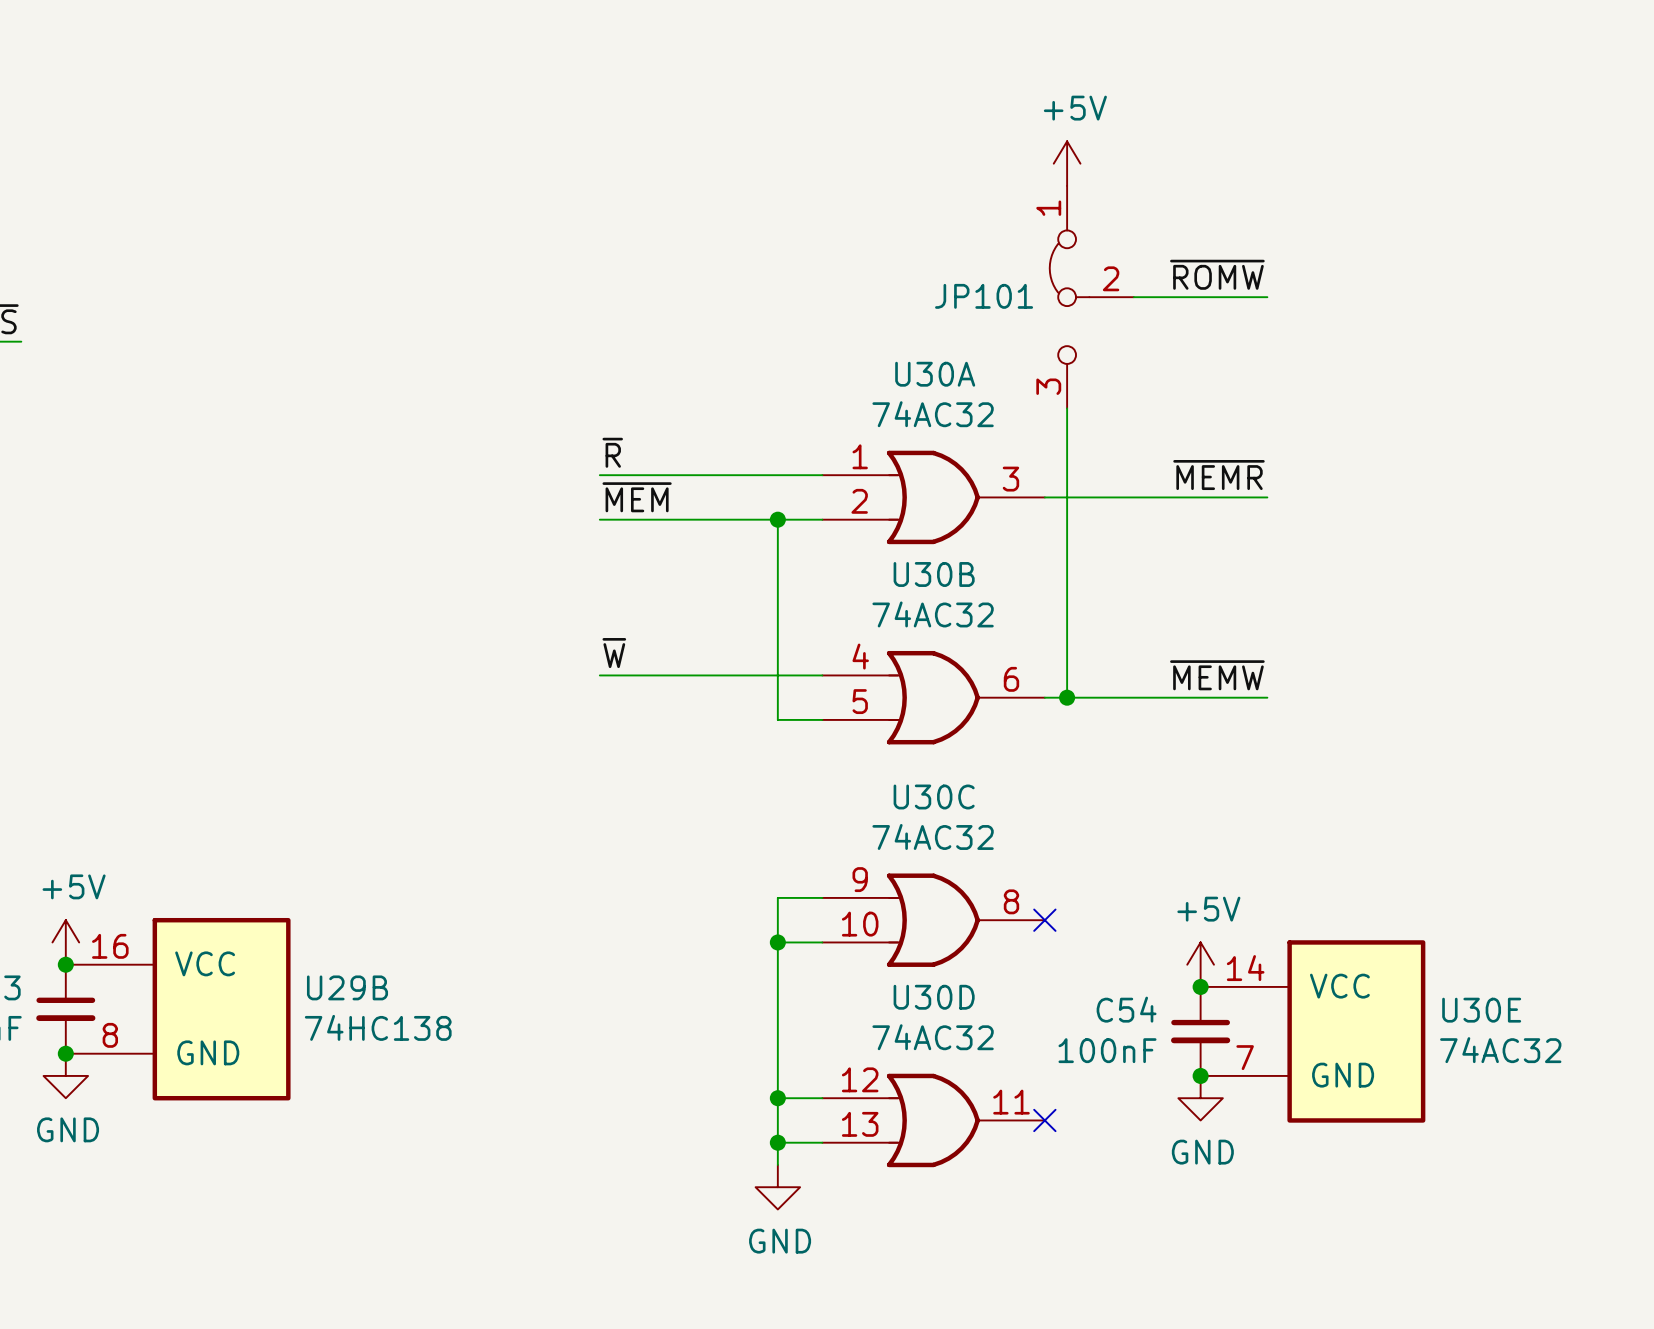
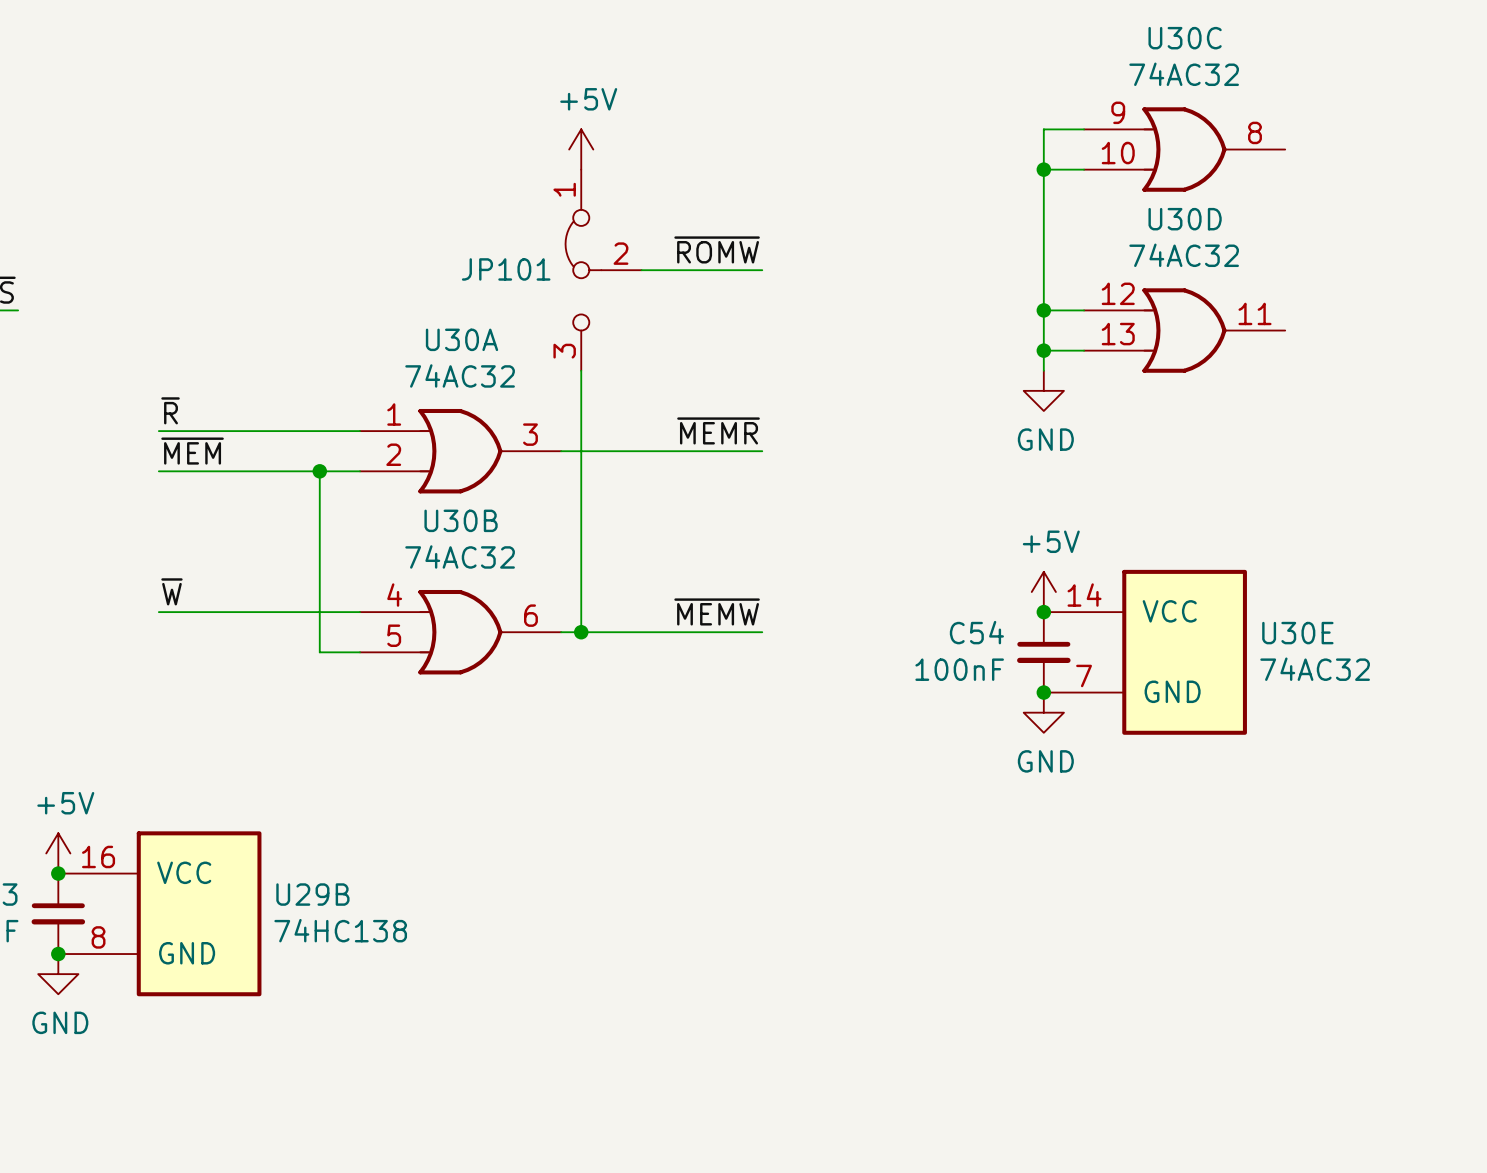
wire: none -> (1084, 129) (1043, 129) (1043, 370)
power symbol: none -> +5V (581, 149)
power symbol: +5V (1067, 163) -> none
wire: none -> (1043, 169) (1084, 169)
junction: none -> (1043, 169)
label position: ~{ROMW} (1217, 274) -> ~{ROMW} (717, 249)
JP101 position: (1091, 297) -> (603, 270)
wire: (1133, 297) (1267, 297) -> (641, 270) (762, 270)
wire: none -> (1043, 310) (1084, 310)
junction: none -> (1043, 310)
wire: none -> (1043, 350) (1084, 350)
junction: none -> (1043, 350)
wire: (1067, 408) (1067, 697) -> (581, 370) (581, 632)
power symbol: none -> GND (1043, 390)
label position: ~{R} (612, 452) -> ~{R} (170, 410)
wire: (599, 475) (822, 475) -> (158, 431) (360, 431)
label position: ~{MEMR} (1218, 475) -> ~{MEMR} (718, 430)
label position: ~{MEM} (637, 497) -> ~{MEM} (192, 451)
U30A position: (933, 497) -> (460, 451)
wire: (1044, 497) (1267, 497) -> (561, 451) (762, 451)
junction: none -> (319, 471)
wire: (599, 519) (822, 519) -> (158, 471) (360, 471)
wire: (777, 519) (777, 719) (822, 719) -> (319, 471) (319, 652) (360, 652)
junction: (777, 519) -> none
label position: ~{W} (614, 653) -> ~{W} (171, 591)
power symbol: none -> +5V (1043, 591)
wire: (599, 675) (822, 675) -> (158, 612) (360, 612)
junction: none -> (1043, 612)
label position: ~{MEMW} (1217, 675) -> ~{MEMW} (717, 611)
junction: none -> (581, 632)
U30B position: (933, 697) -> (460, 632)
wire: (1044, 697) (1267, 697) -> (561, 632) (762, 632)
junction: (1067, 697) -> none
junction: none -> (1043, 692)
power symbol: none -> GND (1043, 712)
wire: (822, 897) (777, 897) (777, 1164) -> none
U30C position: (933, 920) -> (1184, 149)
no-connect mark: (1044, 920) -> none
wire: (777, 942) (822, 942) -> none
junction: (777, 942) -> none
power symbol: +5V (1200, 964) -> none
junction: (1200, 986) -> none
C54 position: (1200, 1031) -> (1043, 652)
U30E position: (1312, 1031) -> (1145, 652)
junction: (1200, 1075) -> none
wire: (777, 1098) (822, 1098) -> none
junction: (777, 1098) -> none
power symbol: GND (1200, 1098) -> none
U30D position: (933, 1120) -> (1184, 330)
no-connect mark: (1044, 1120) -> none
wire: (777, 1142) (822, 1142) -> none
junction: (777, 1142) -> none
power symbol: GND (777, 1187) -> none

